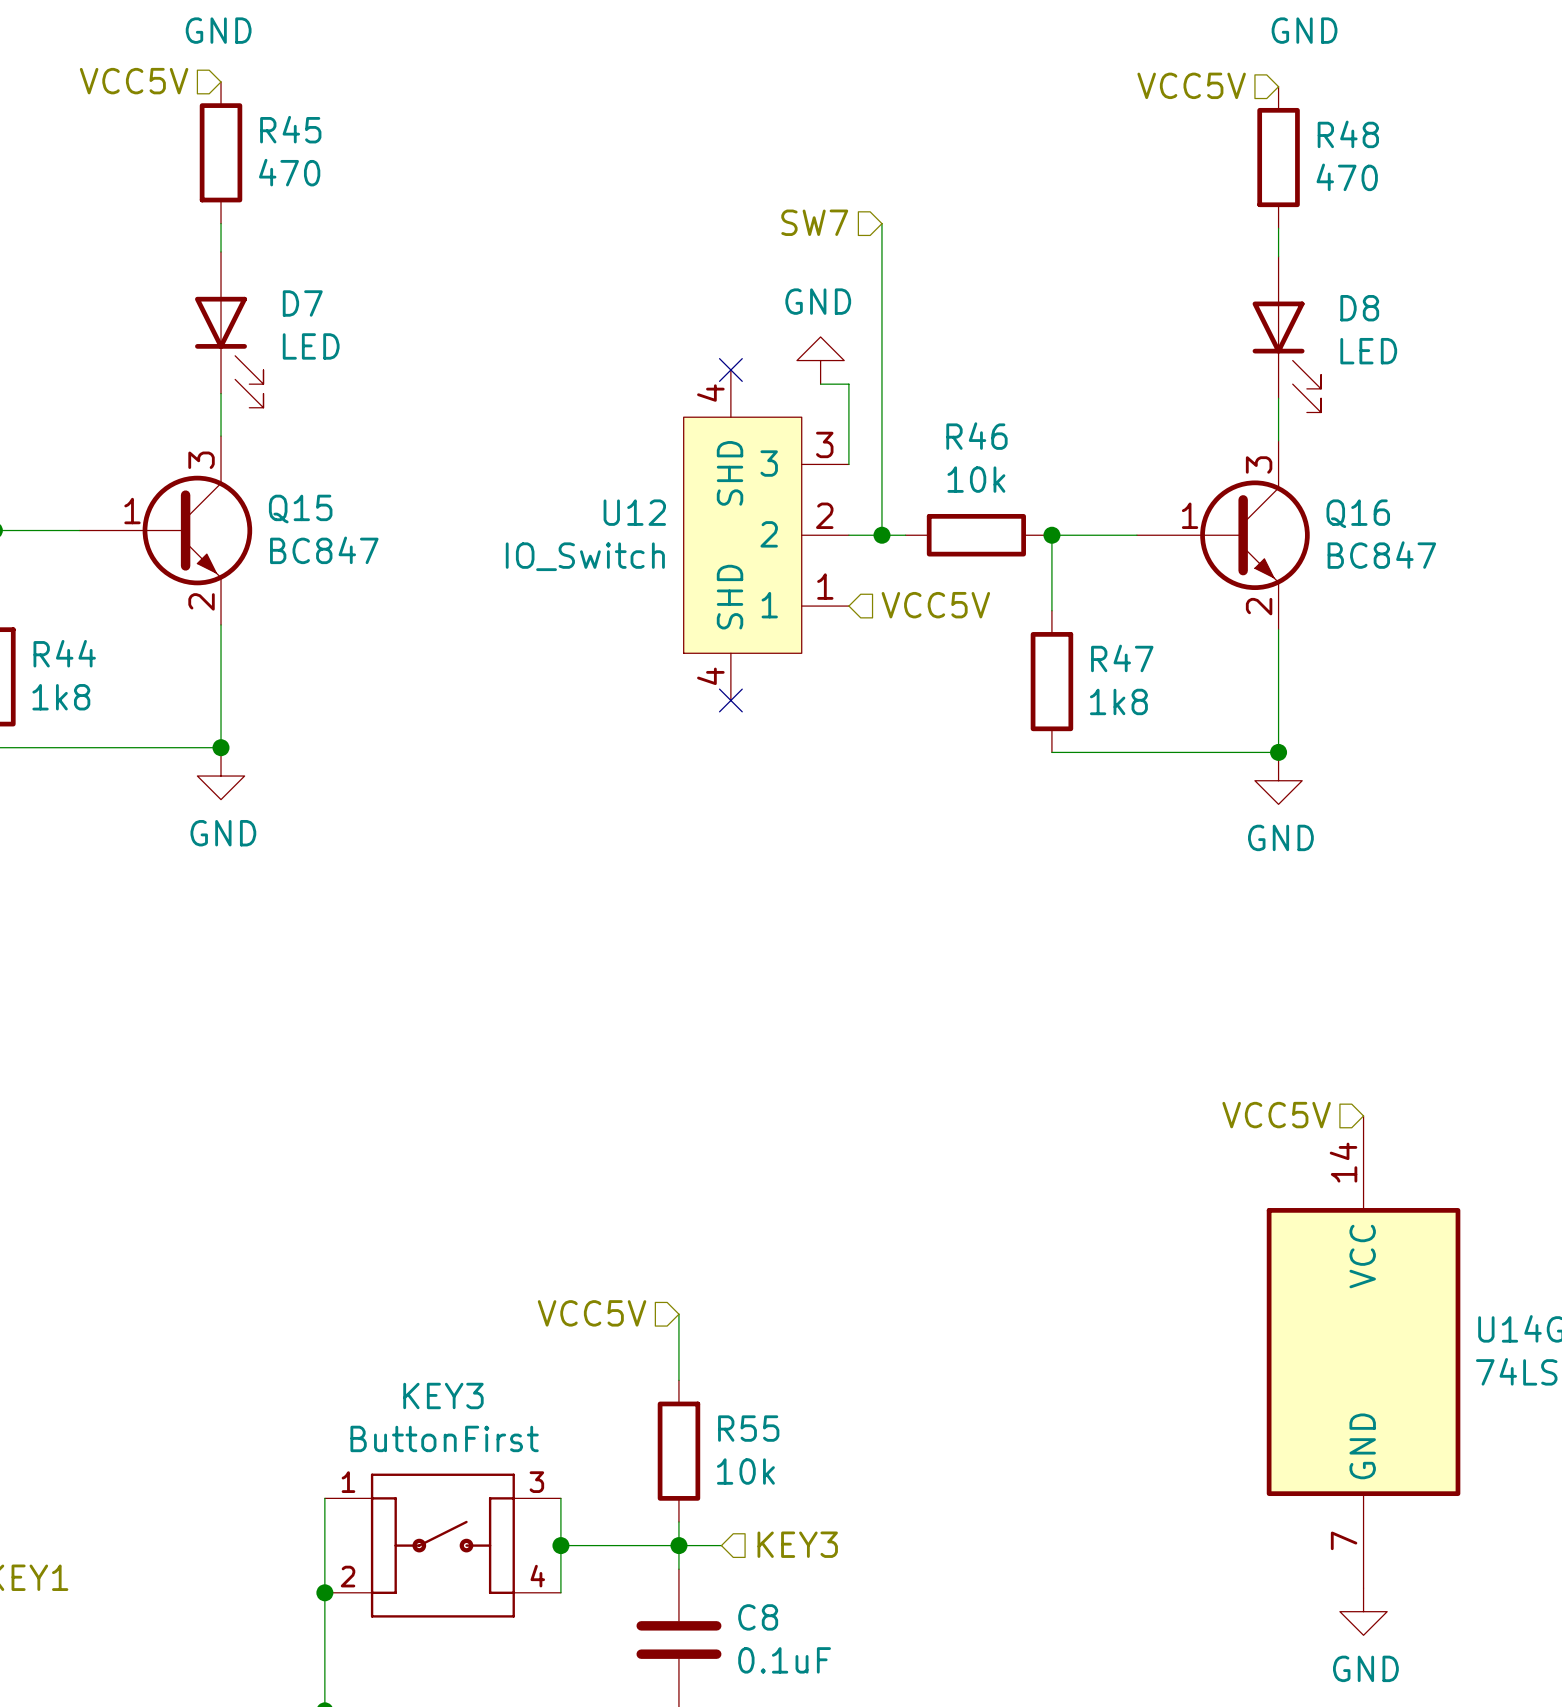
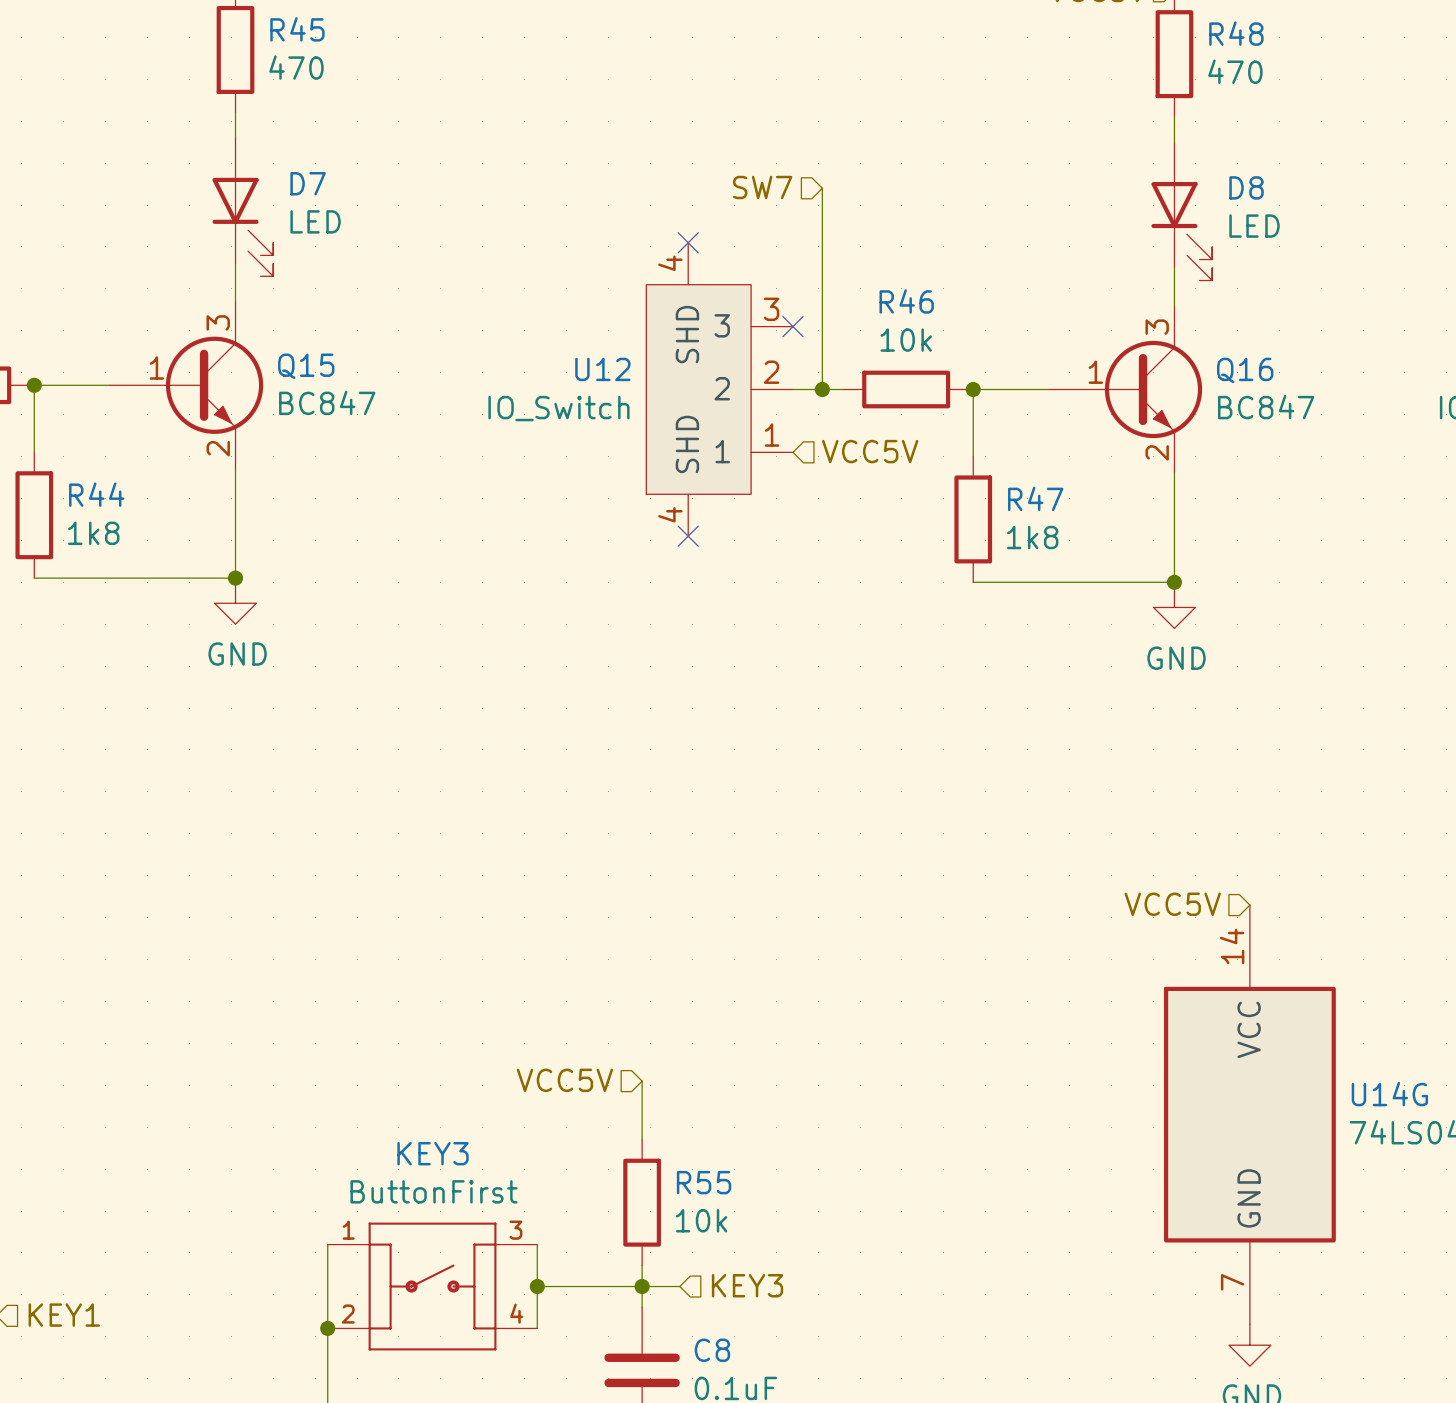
hierarchical label position: SW7 (814, 222) -> SW7 (762, 187)
wire: (881, 223) (881, 308) -> none
power symbol: GND (820, 360) -> none
wire: (820, 384) (848, 384) (848, 464) -> none
no-connect mark: none -> (793, 326)

